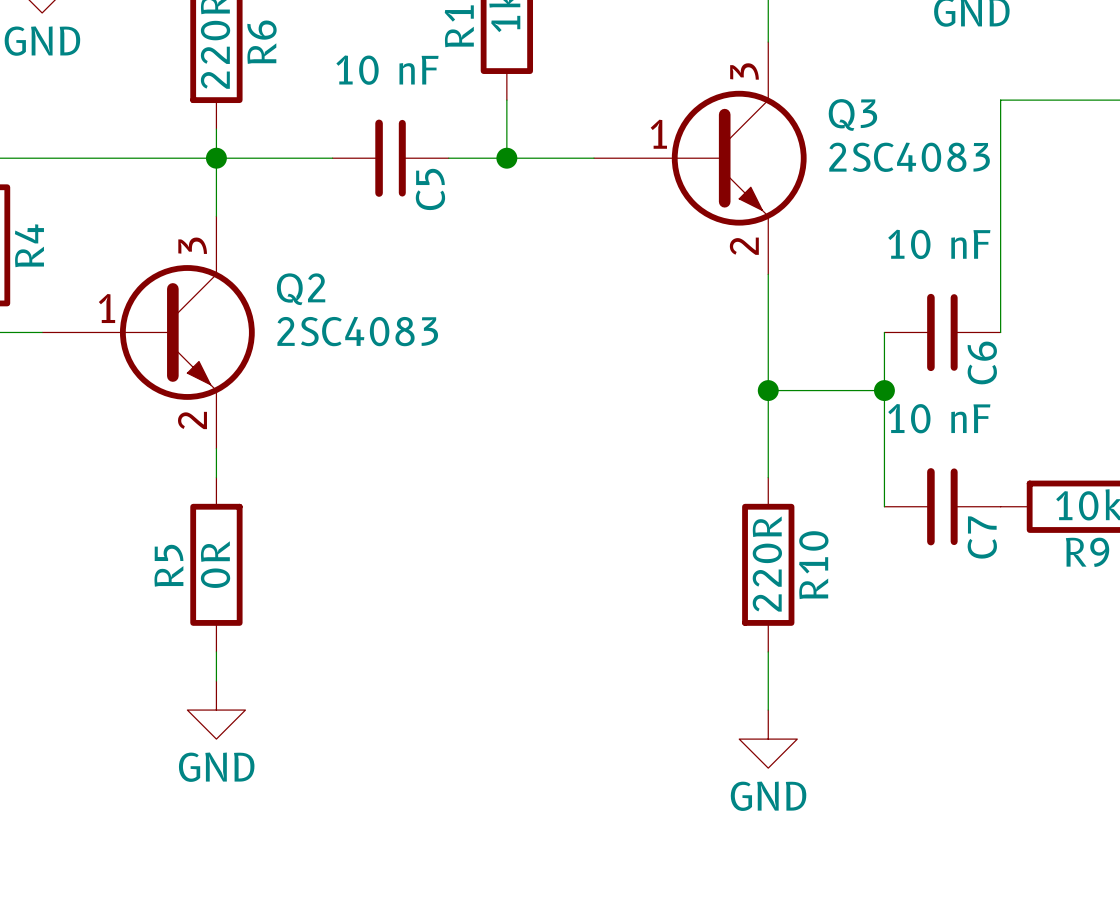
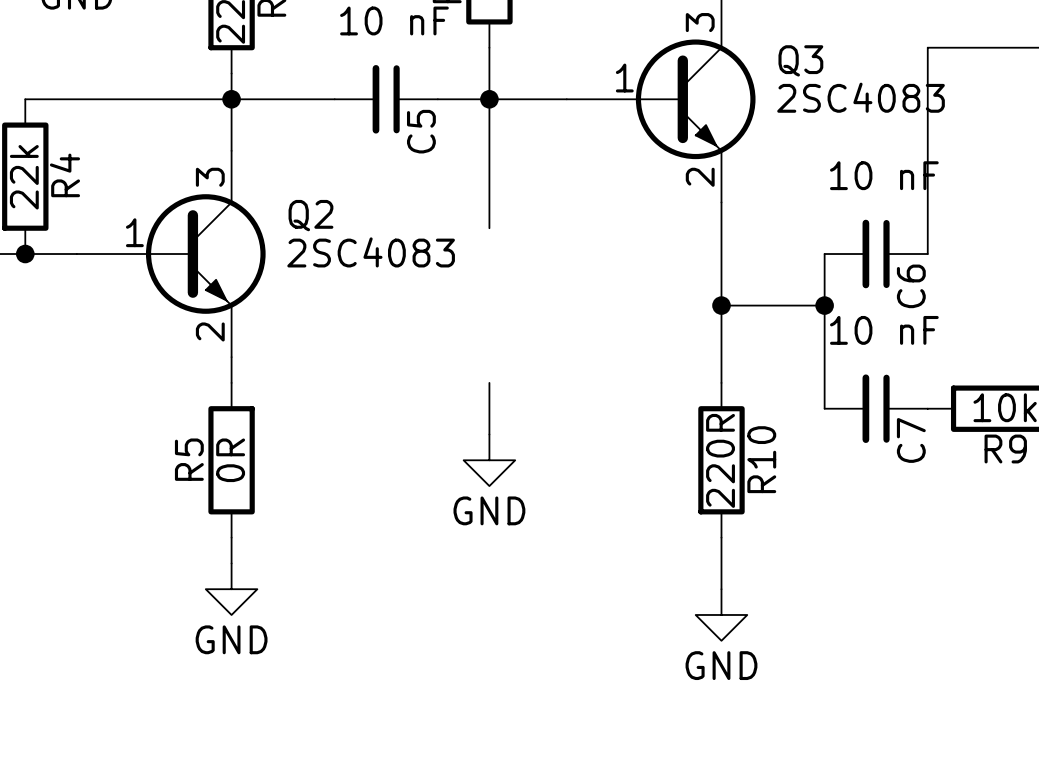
wire: none -> (489, 99) (489, 228)
wire: none -> (489, 382) (489, 434)
power symbol: none -> GND (489, 460)

